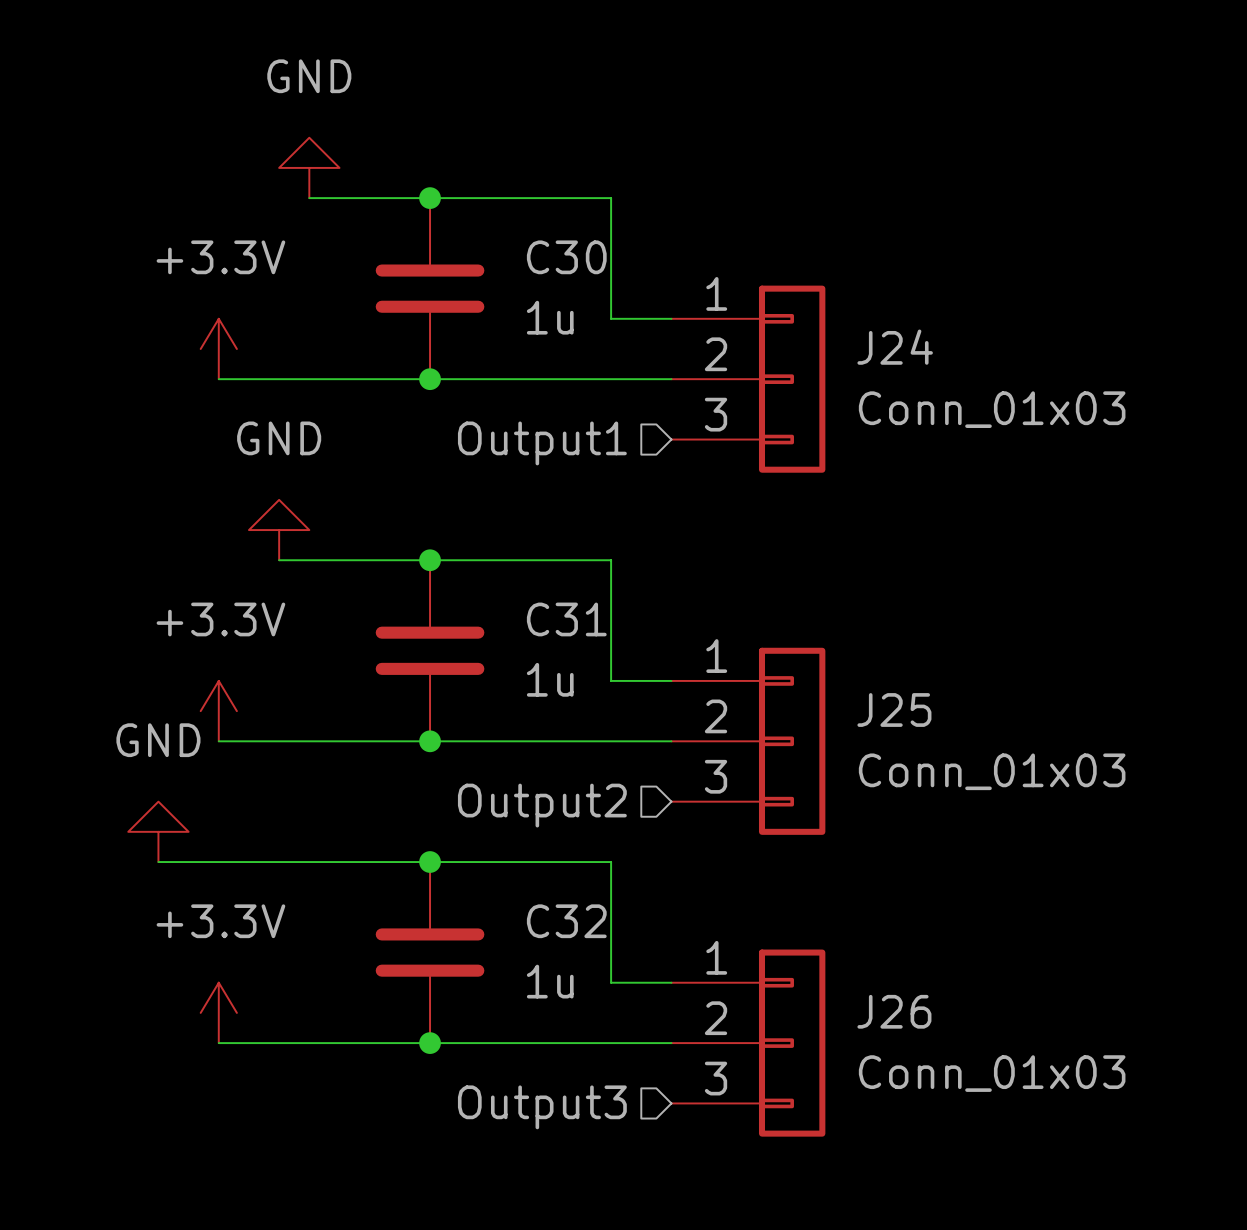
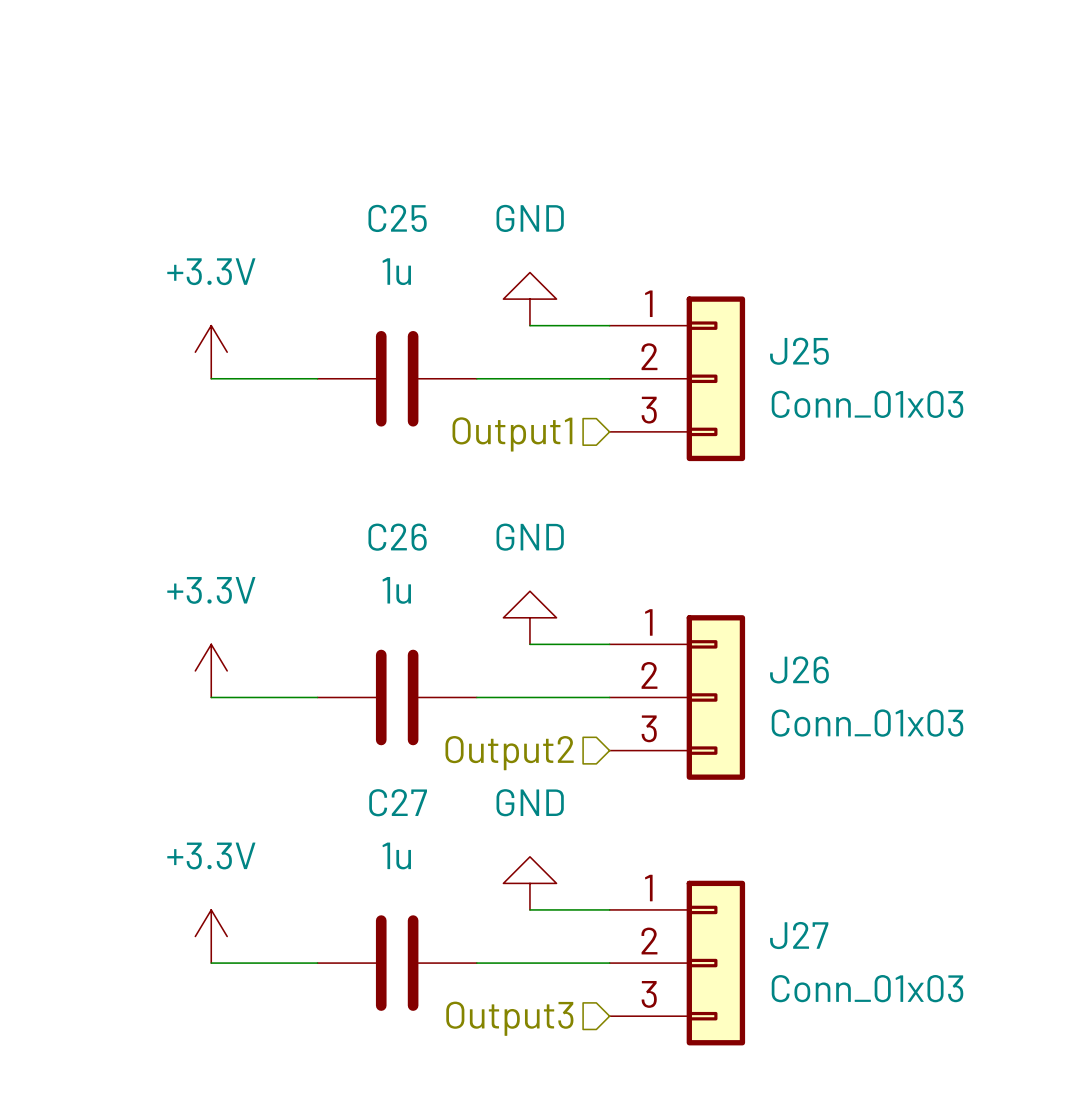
power symbol: GND (309, 167) -> none
wire: (309, 198) (611, 198) (611, 318) -> (529, 325) (556, 325)
junction: (430, 198) -> none
C30: 1u (430, 288) -> none
power symbol: none -> GND (529, 299)
J24 name: J24 (895, 347) -> J25 (799, 351)
junction: (430, 379) -> none
C25: none -> 1u (397, 378)
power symbol: GND (279, 530) -> none
wire: (279, 560) (611, 560) (611, 680) -> (529, 644) (556, 644)
junction: (430, 560) -> none
C31: 1u (430, 650) -> none
power symbol: none -> GND (529, 617)
J25 name: J25 (894, 710) -> J26 (799, 669)
junction: (430, 741) -> none
C26: none -> 1u (397, 697)
power symbol: GND (158, 831) -> none
wire: (158, 862) (611, 862) (611, 982) -> (529, 909) (556, 909)
junction: (430, 862) -> none
C32: 1u (430, 952) -> none
power symbol: none -> GND (529, 883)
J26 name: J26 (894, 1011) -> J27 (799, 935)
junction: (430, 1043) -> none
C27: none -> 1u (397, 963)

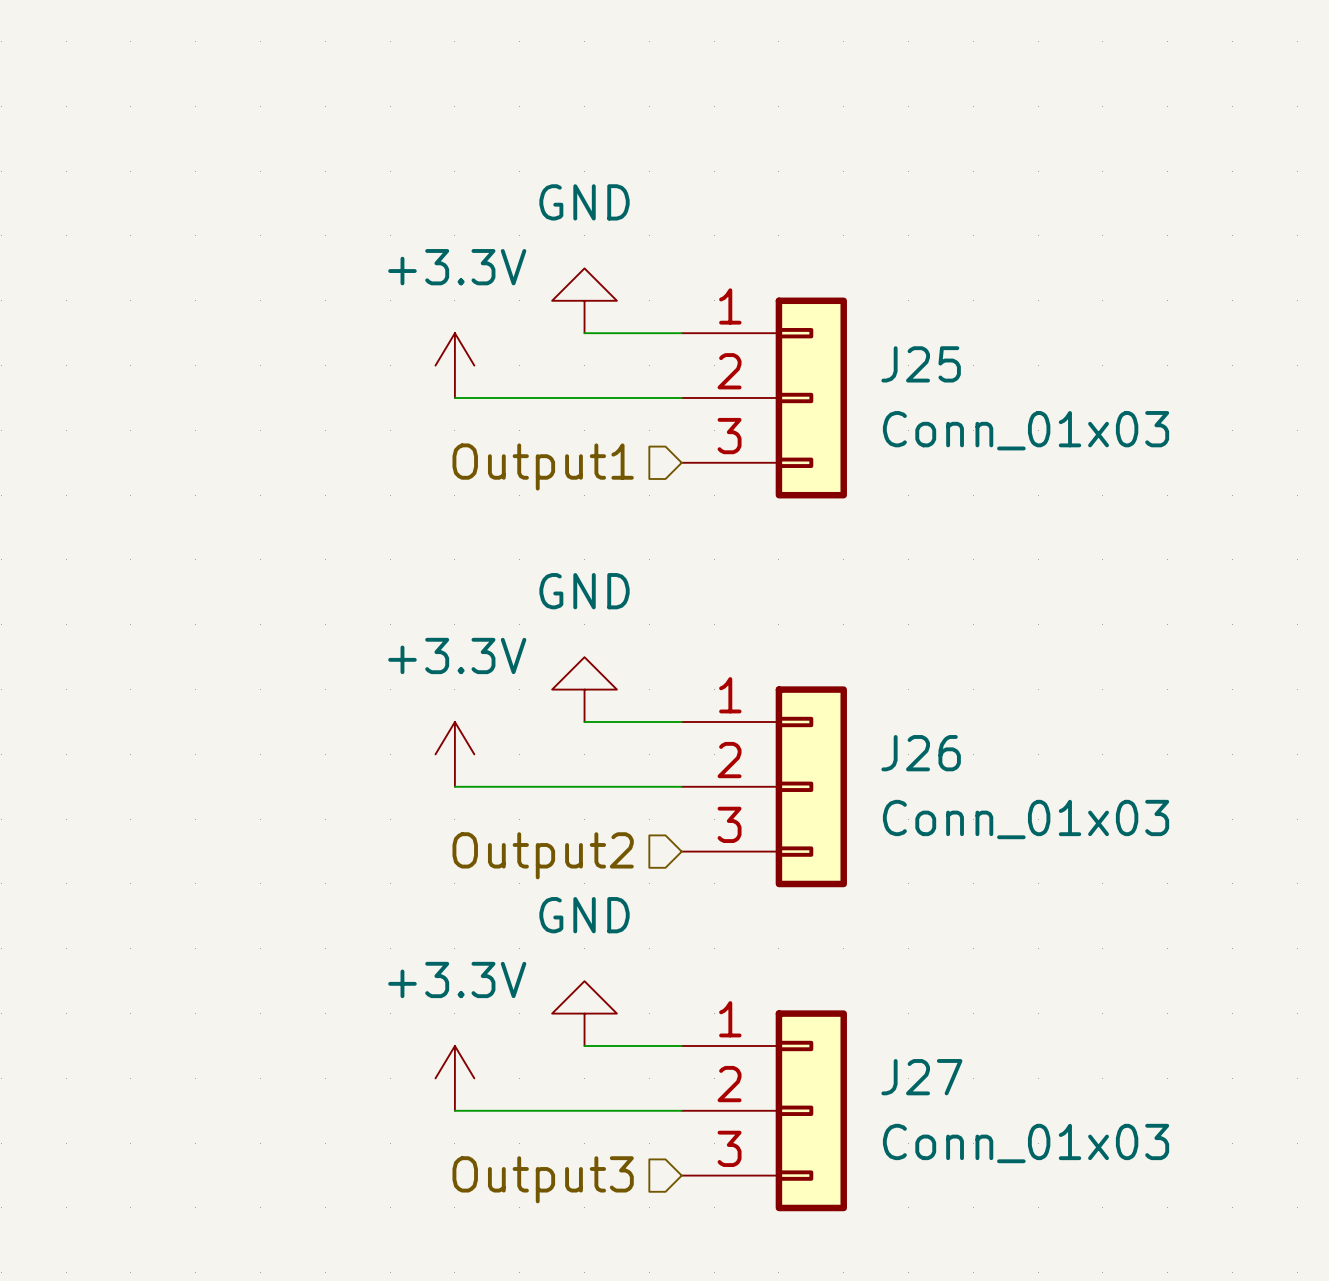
power symbol: +3.3V (211, 352) -> none
power symbol: none -> +3.3V (454, 365)
wire: (211, 378) (317, 378) -> none
C25: 1u (397, 378) -> none
power symbol: +3.3V (211, 670) -> none
power symbol: none -> +3.3V (454, 754)
wire: (211, 697) (317, 697) -> none
C26: 1u (397, 697) -> none
power symbol: +3.3V (211, 936) -> none
power symbol: none -> +3.3V (454, 1078)
wire: (211, 963) (317, 963) -> none
C27: 1u (397, 963) -> none

